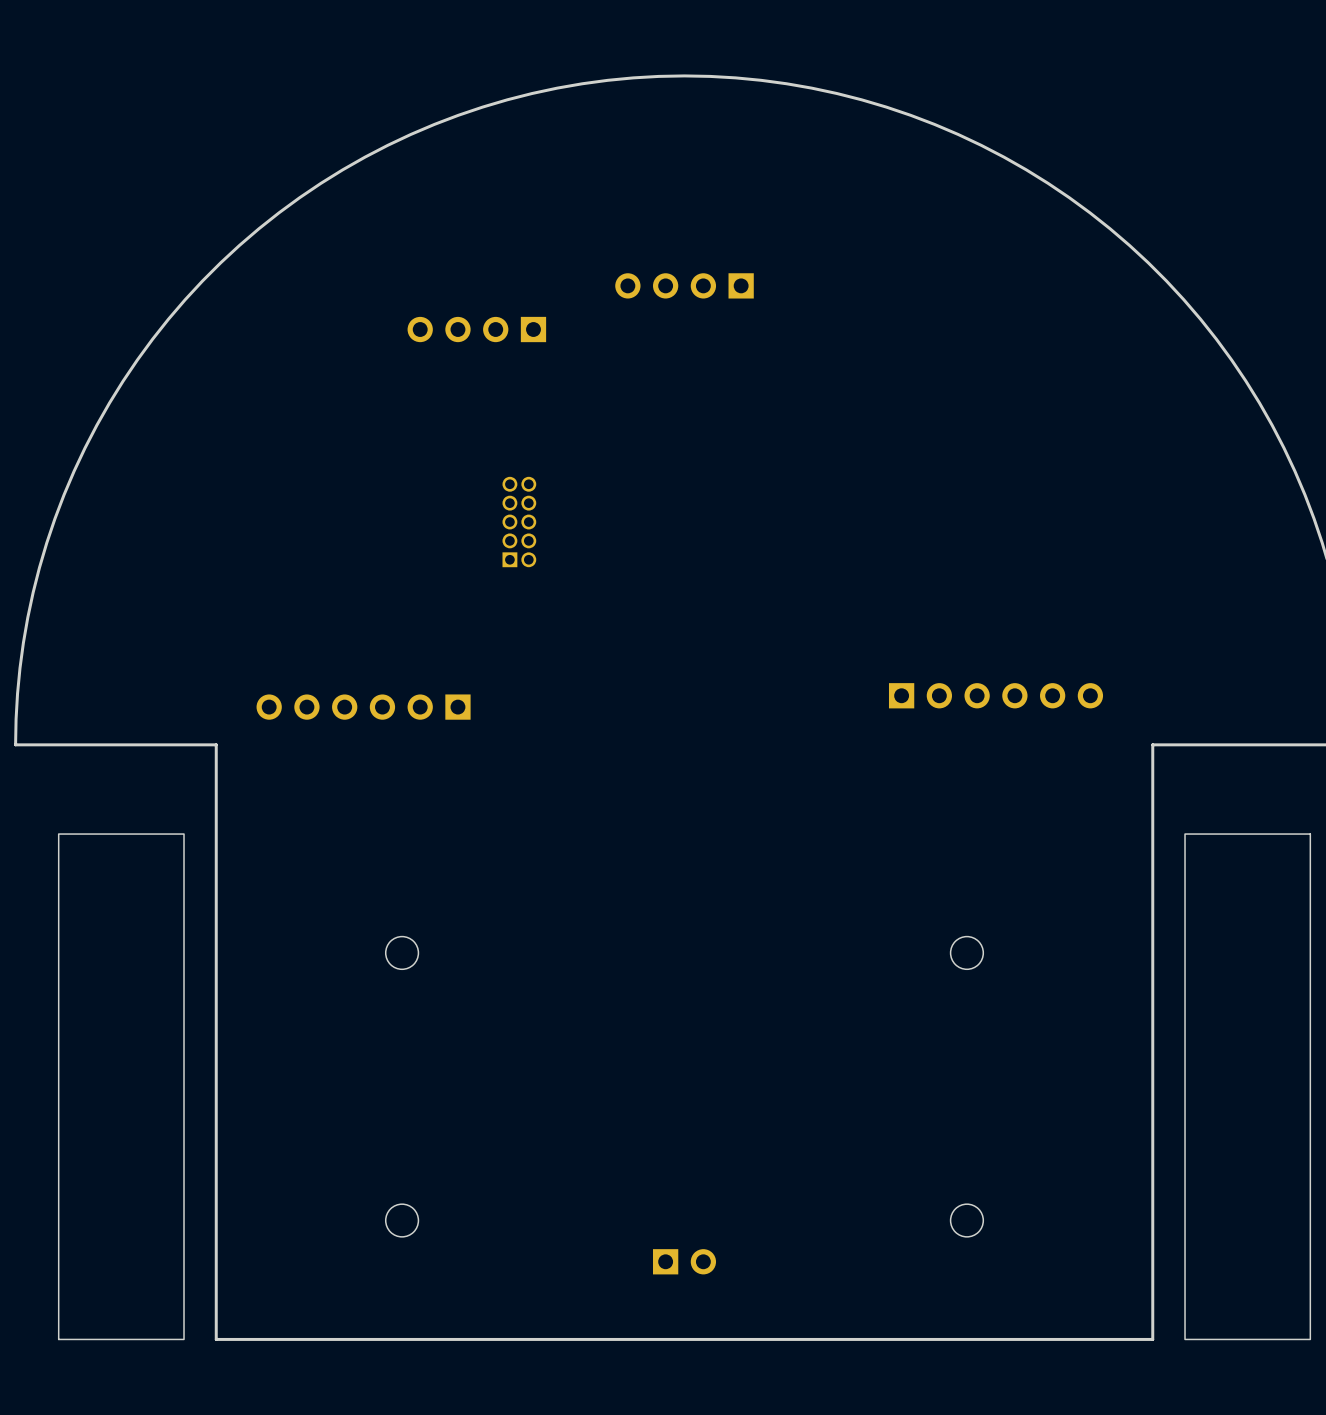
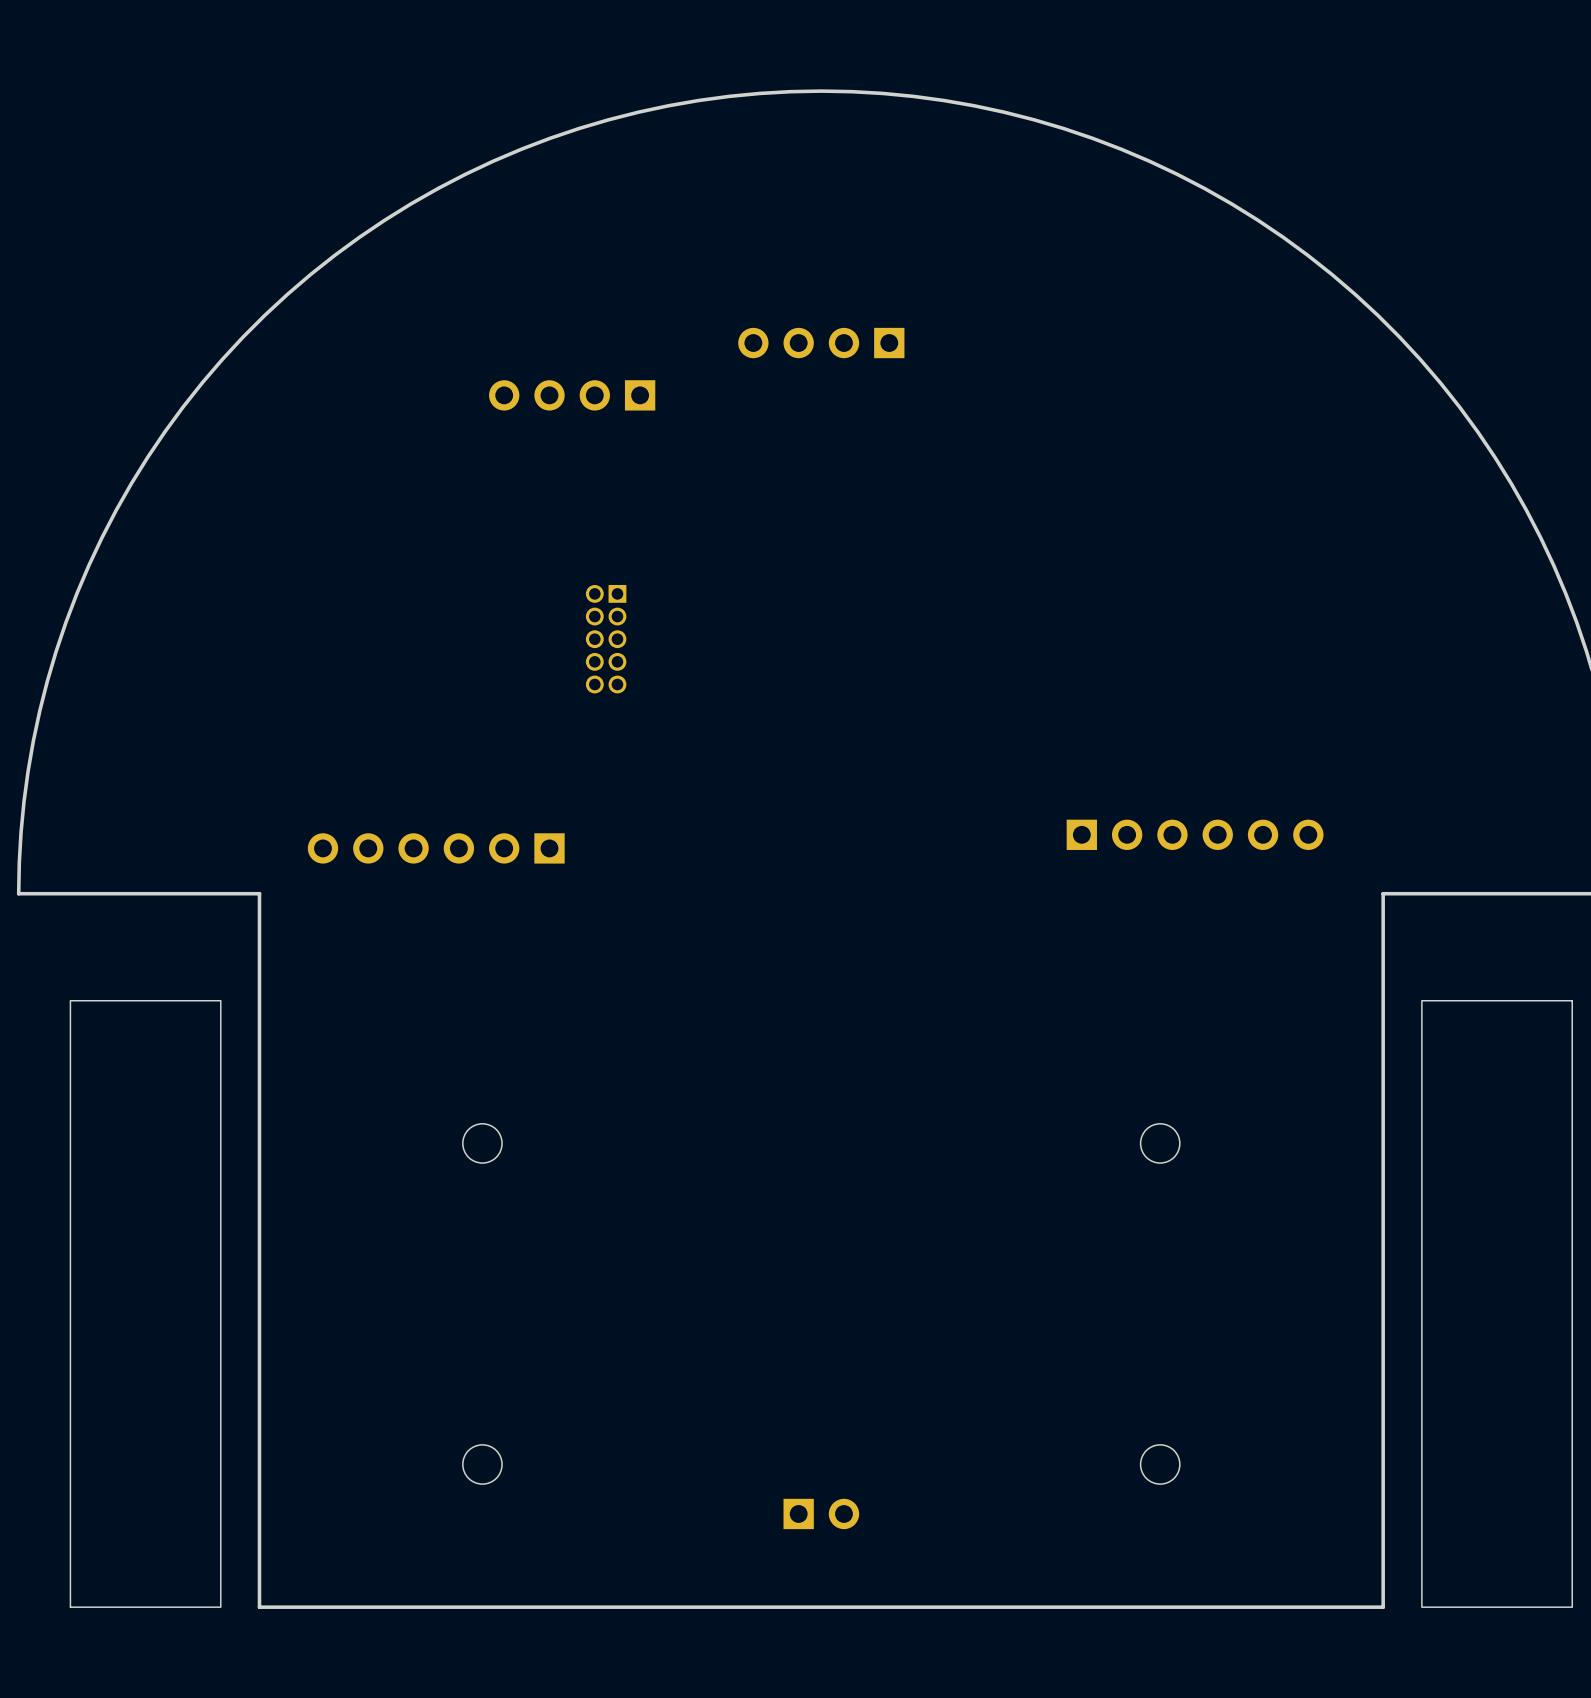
part rotation: 0° (519, 522) -> 180° (606, 639)

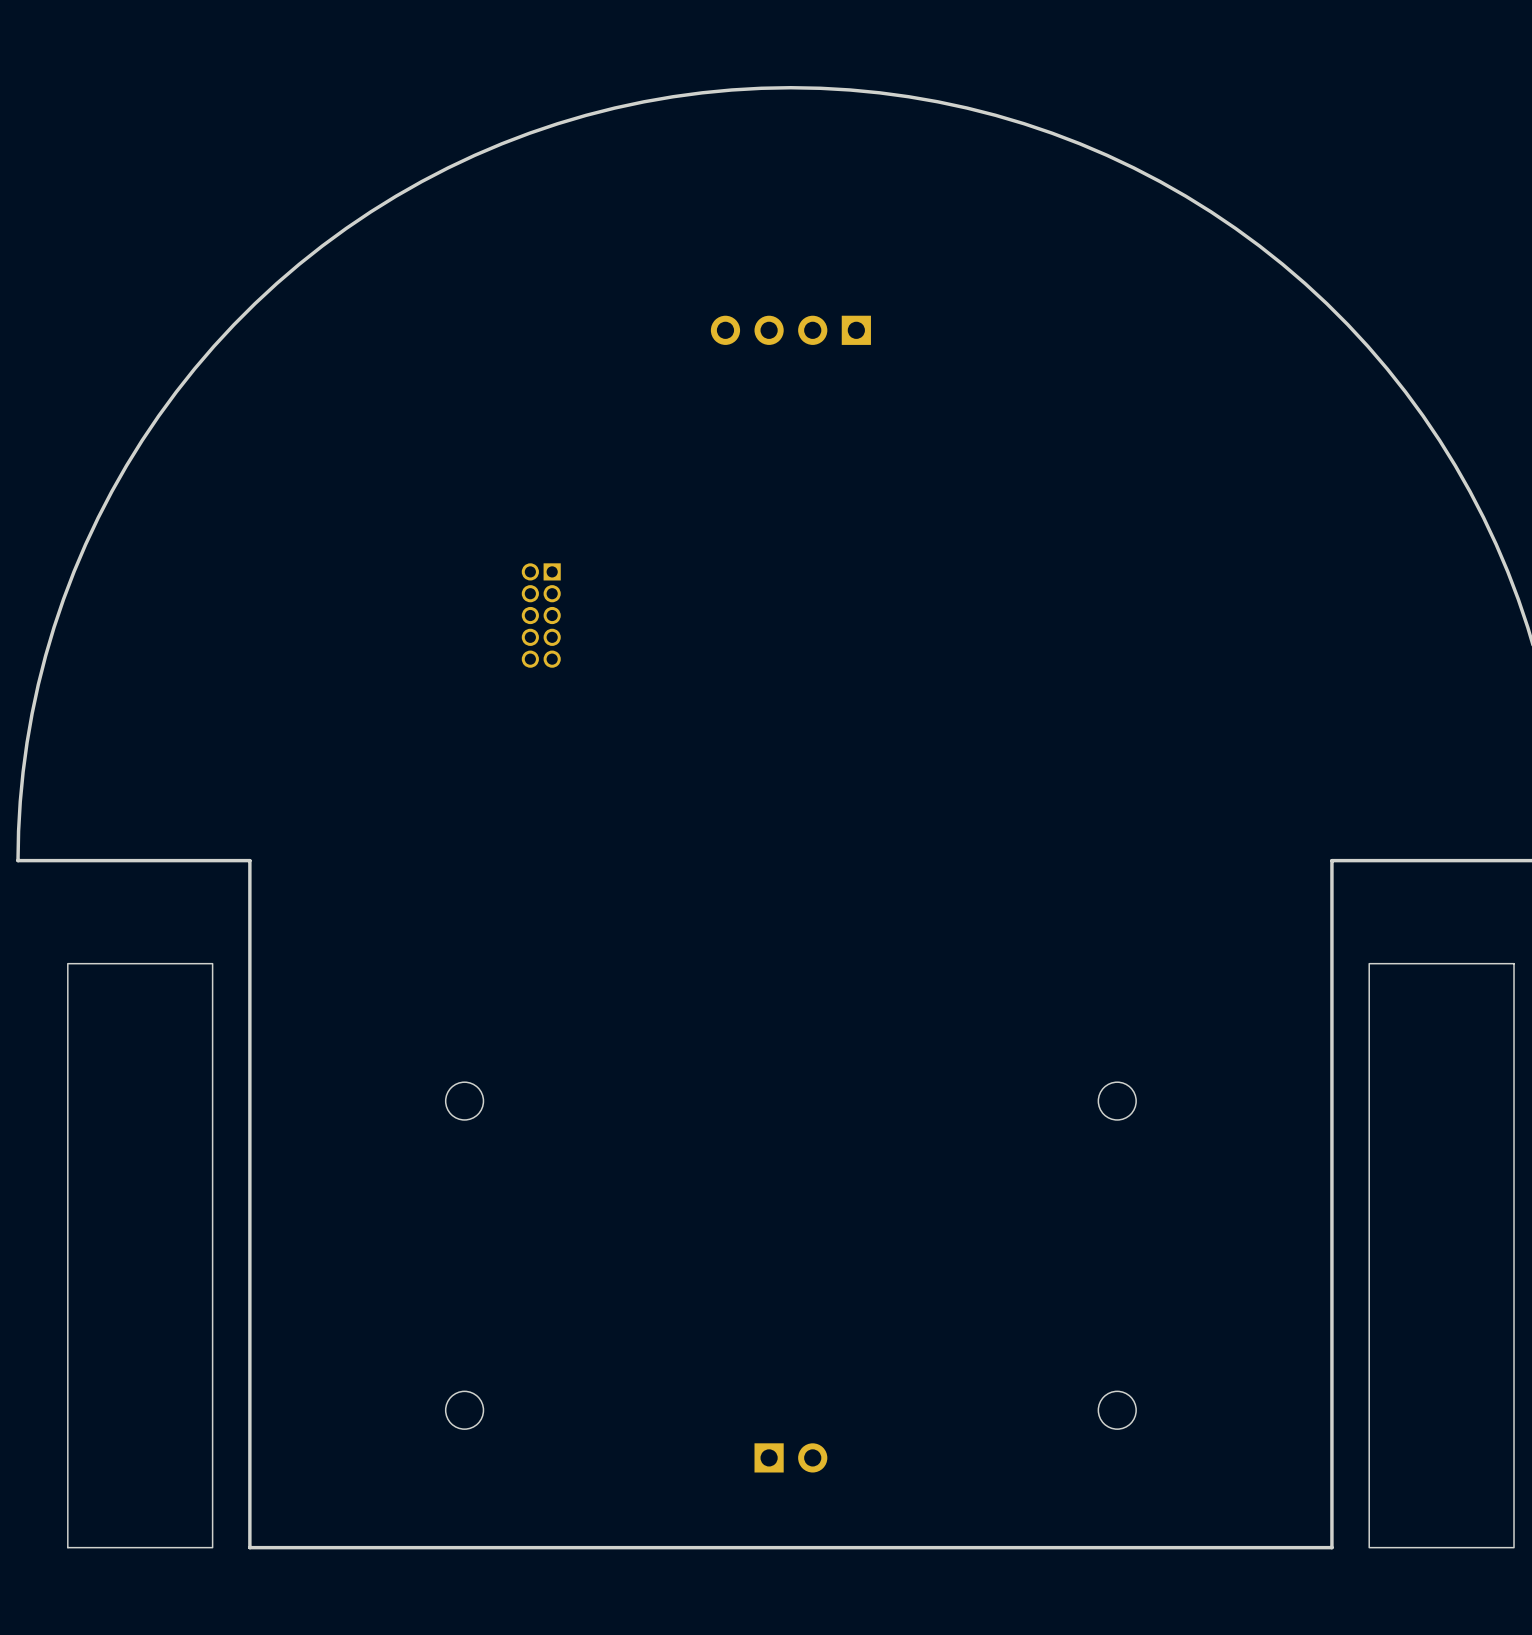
part: (572, 395) -> none
part position: (606, 639) -> (541, 615)
part: (1195, 834) -> none
part: (436, 848) -> none

